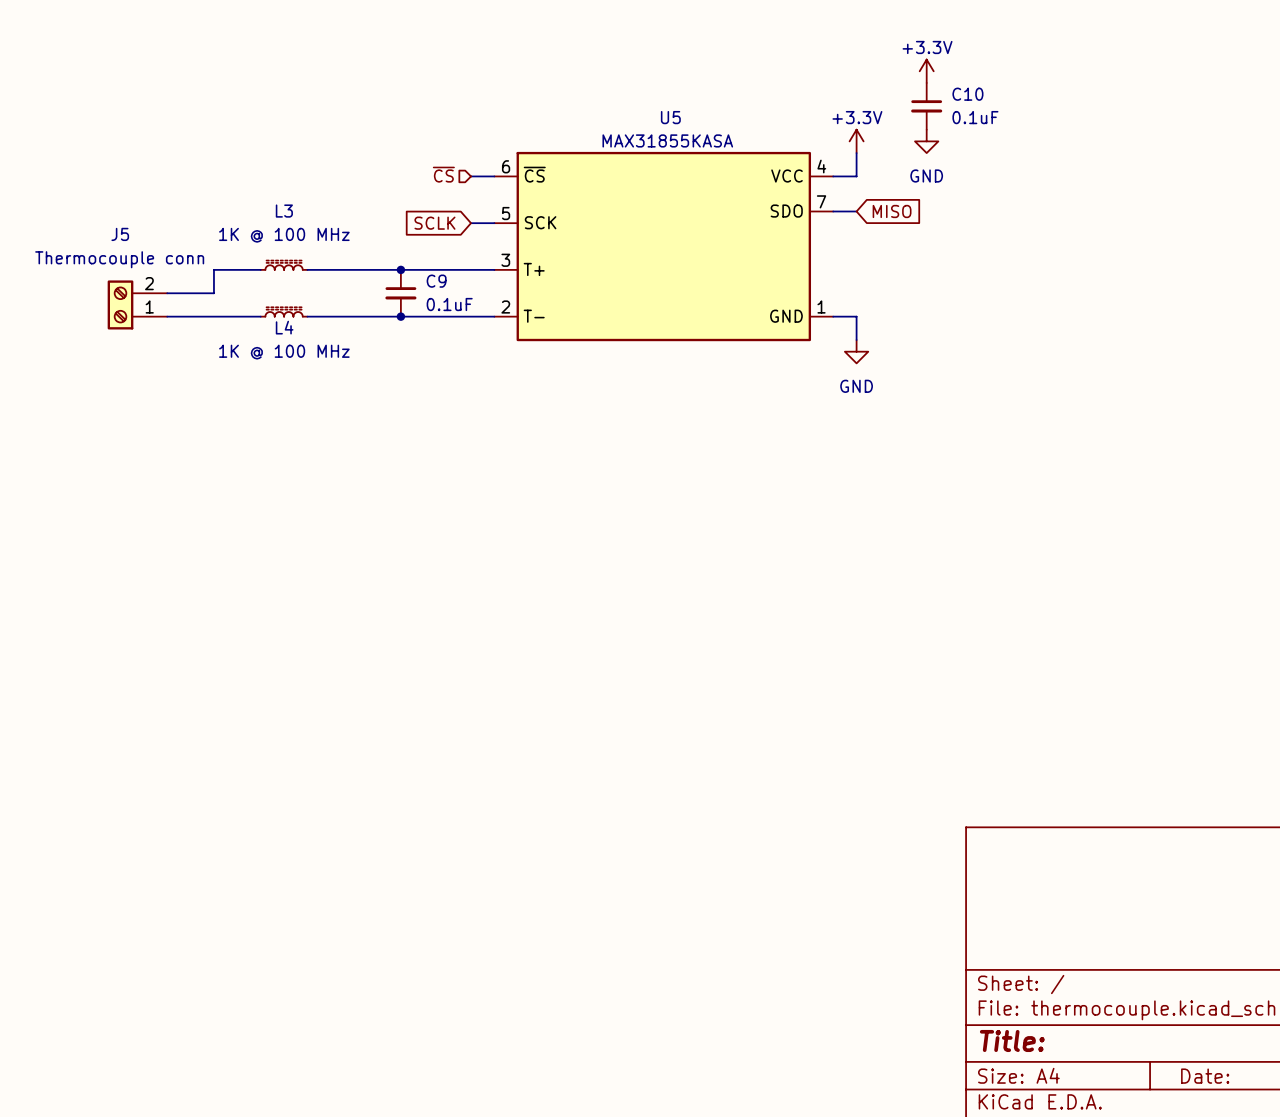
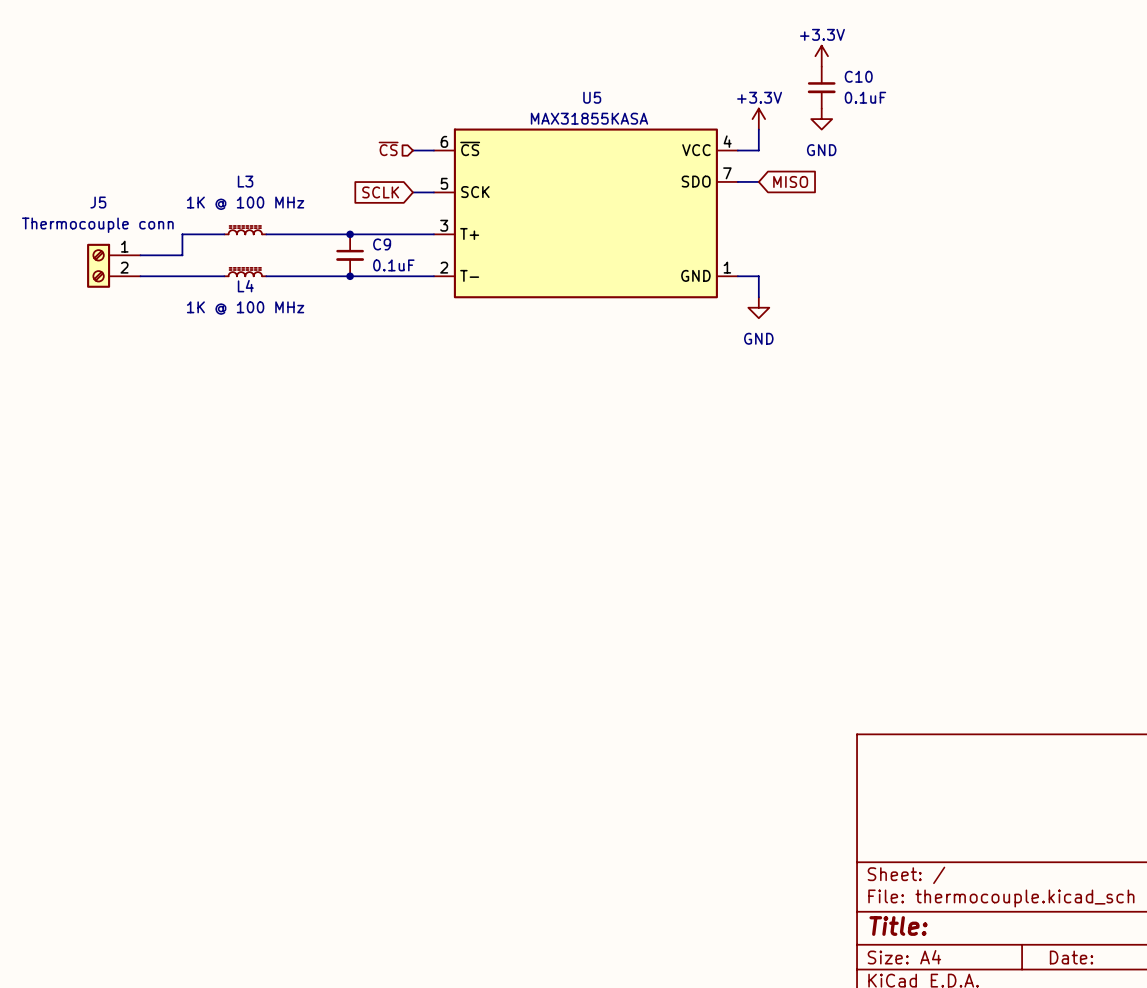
J5 flip: as is (120, 304) -> up-down (98, 265)

